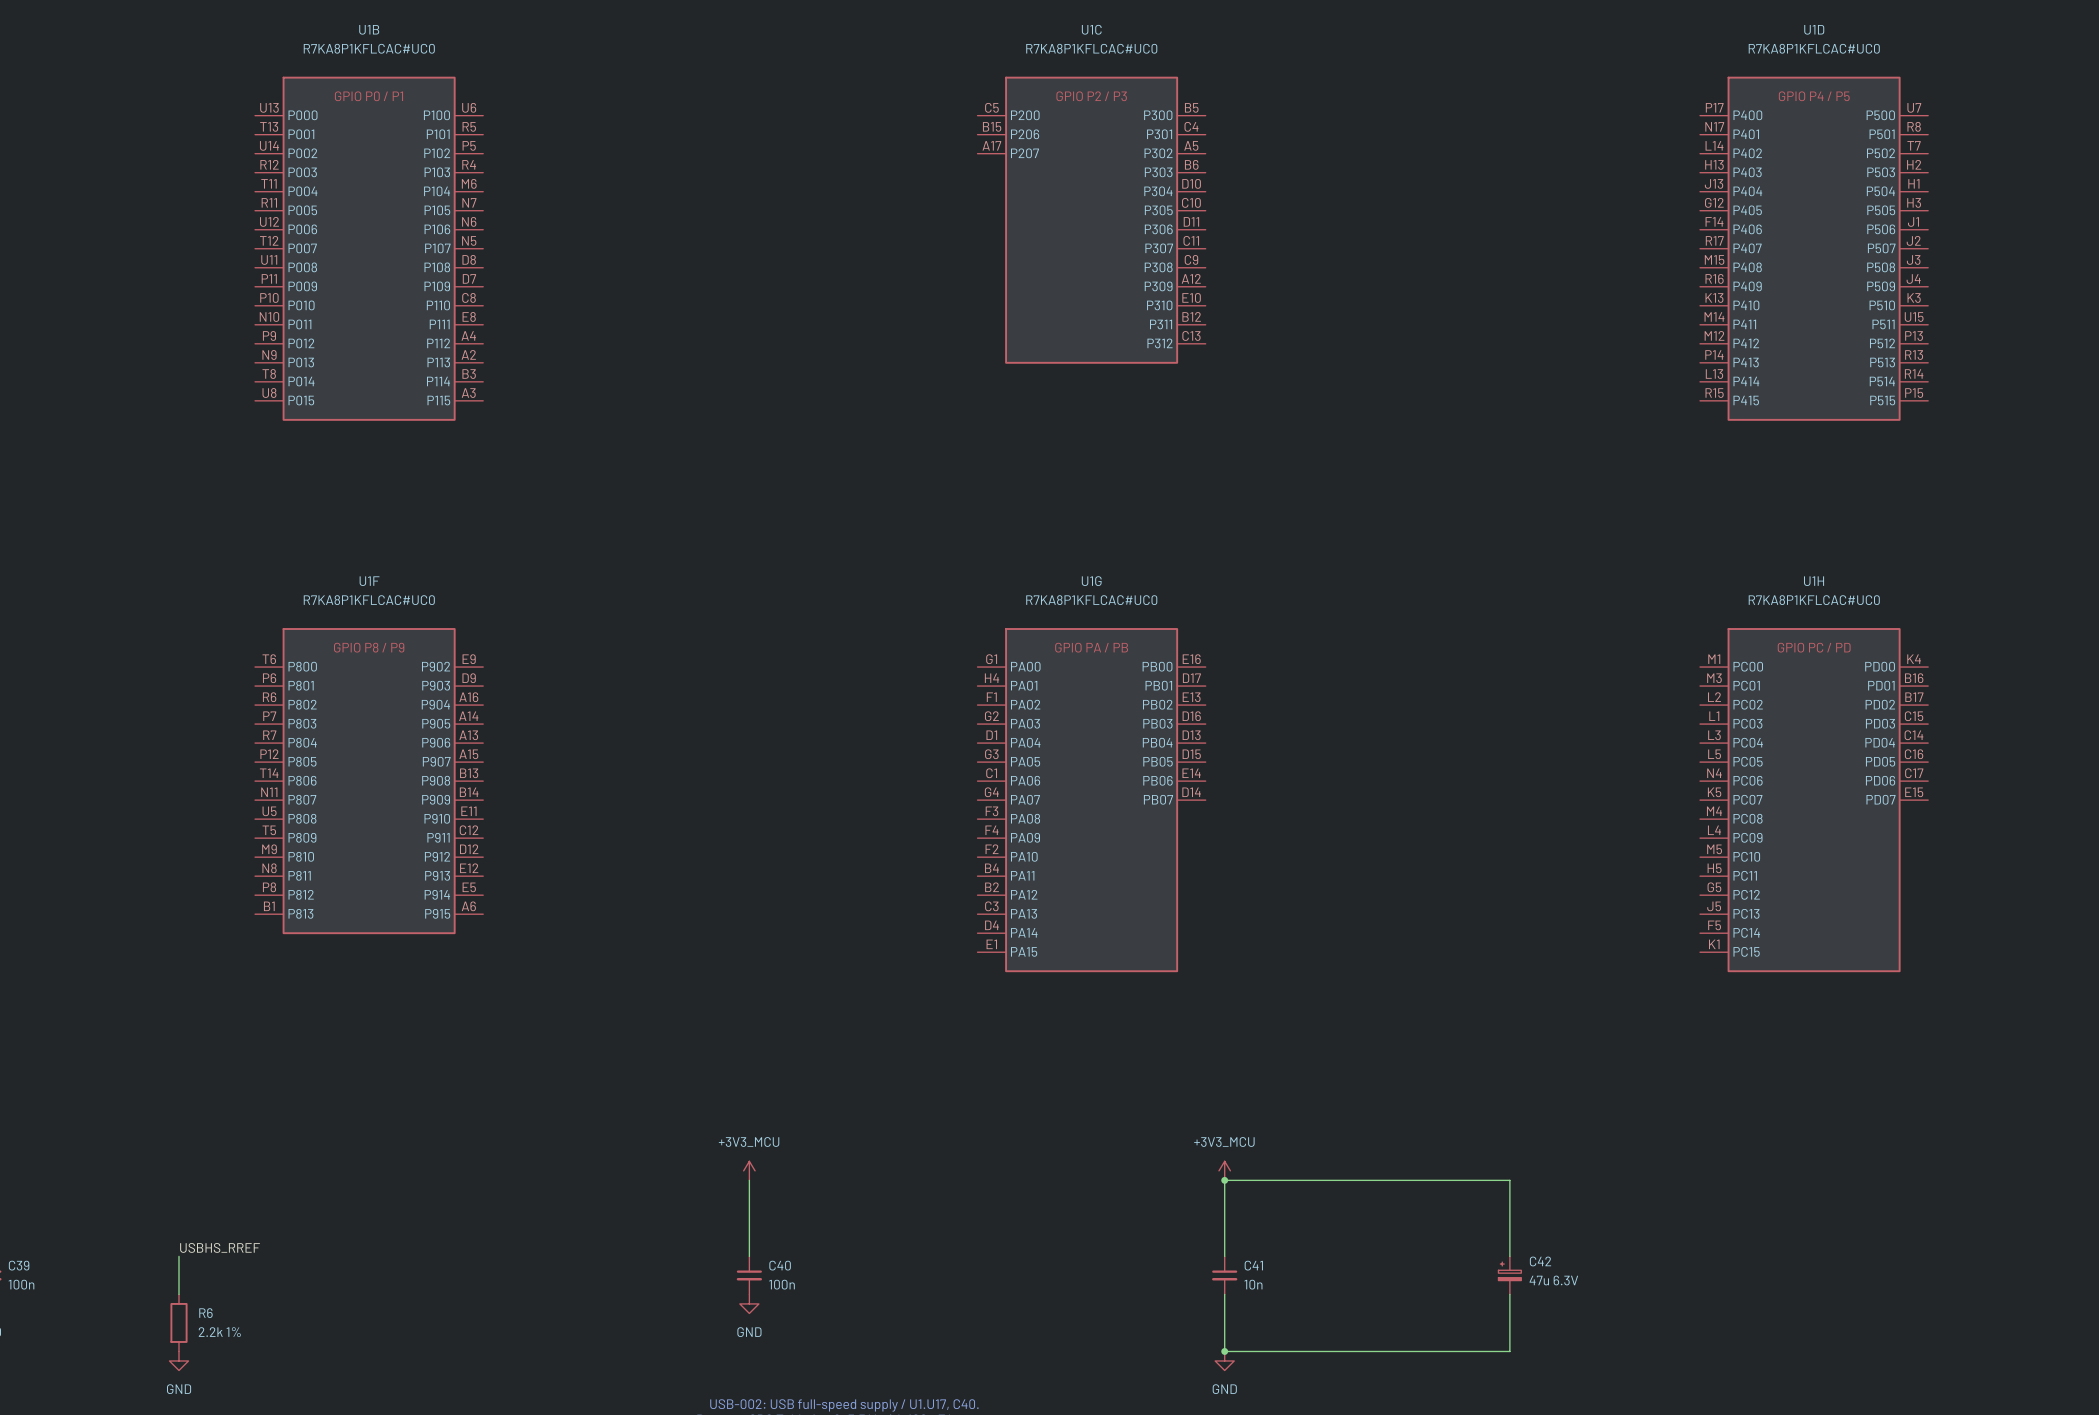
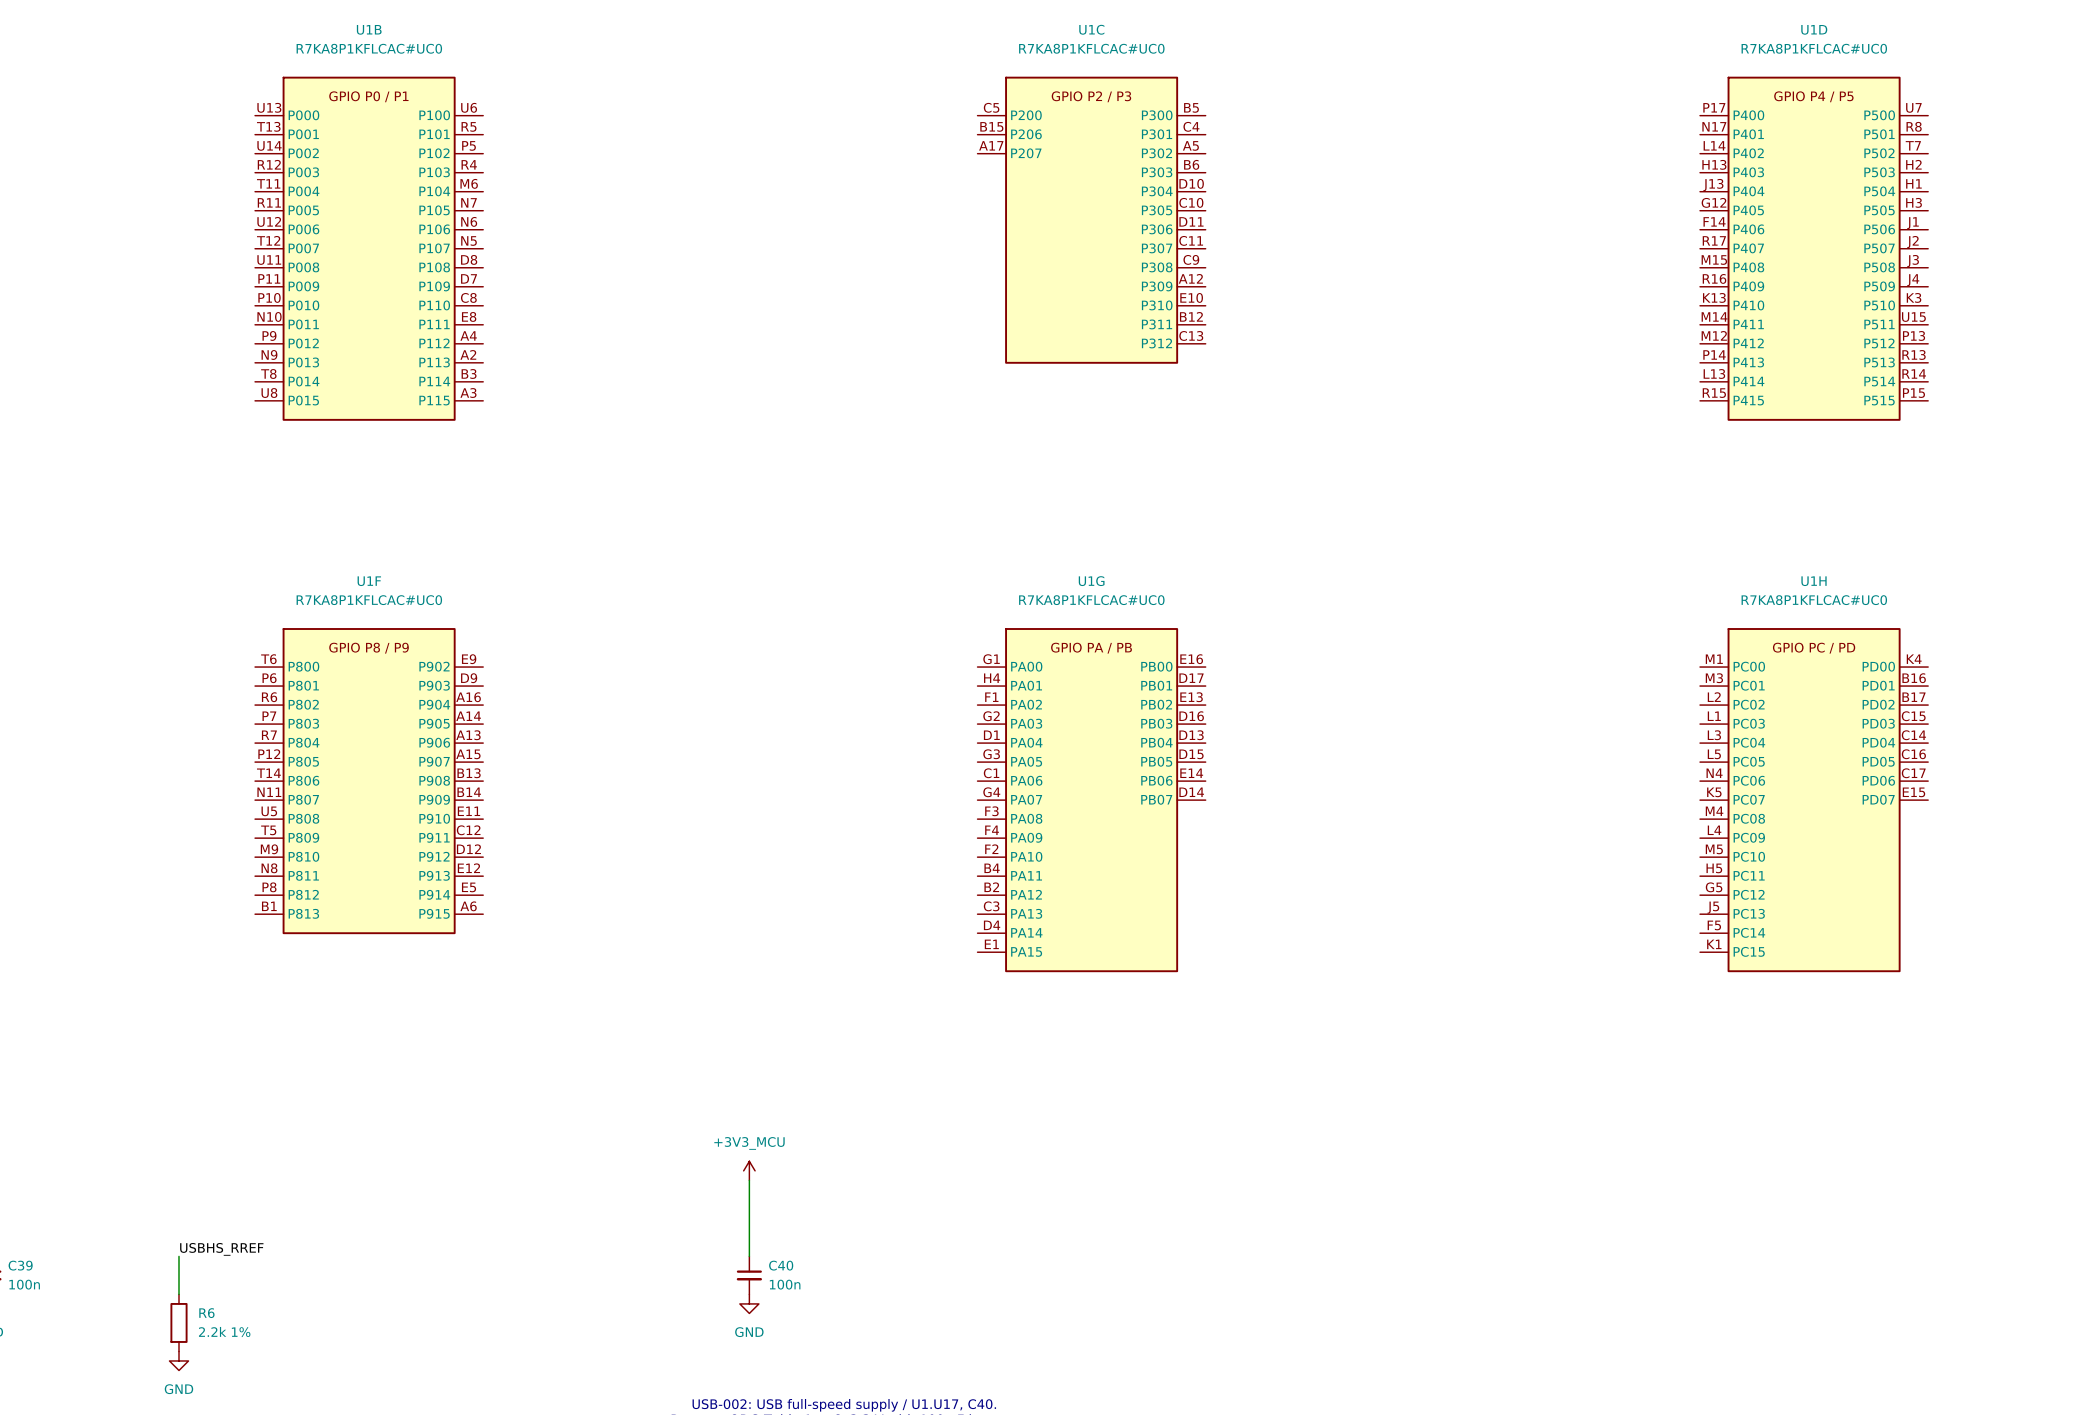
power symbol: +3V3_MCU (1224, 1170) -> none
junction: (1224, 1180) -> none
wire: (1224, 1256) (1224, 1180) (1509, 1180) (1509, 1256) -> none
C41: 10n (1224, 1275) -> none
C42: 47u 6.3V (1509, 1275) -> none
wire: (1224, 1294) (1224, 1351) (1509, 1351) (1509, 1294) -> none
junction: (1224, 1351) -> none
power symbol: GND (1224, 1360) -> none

